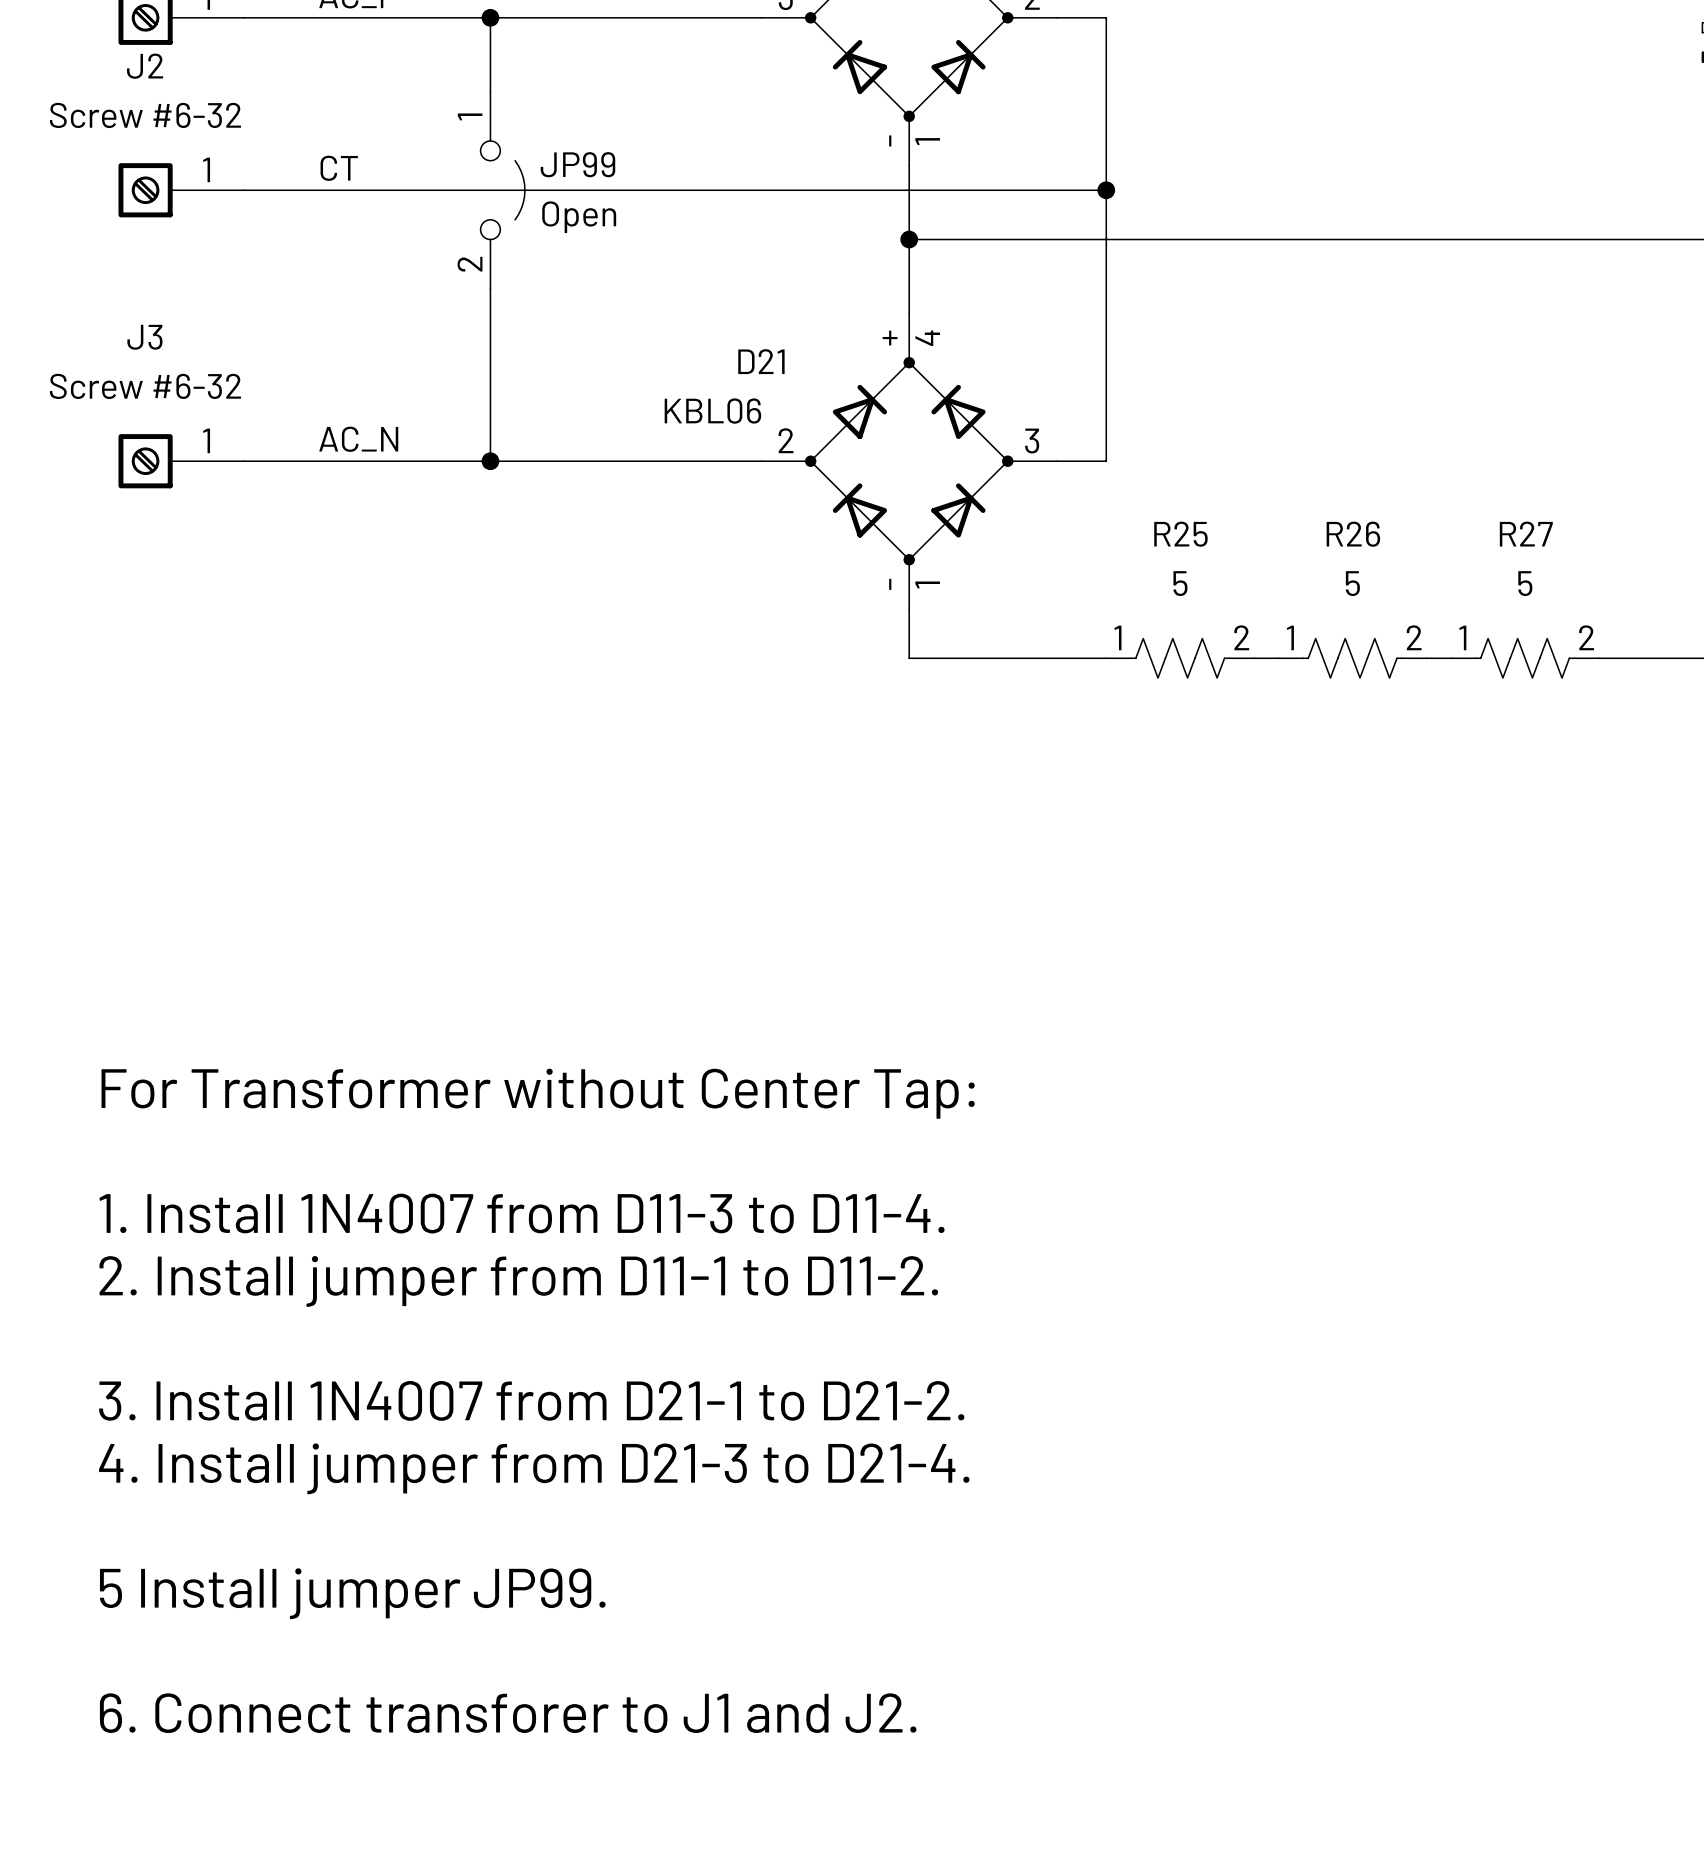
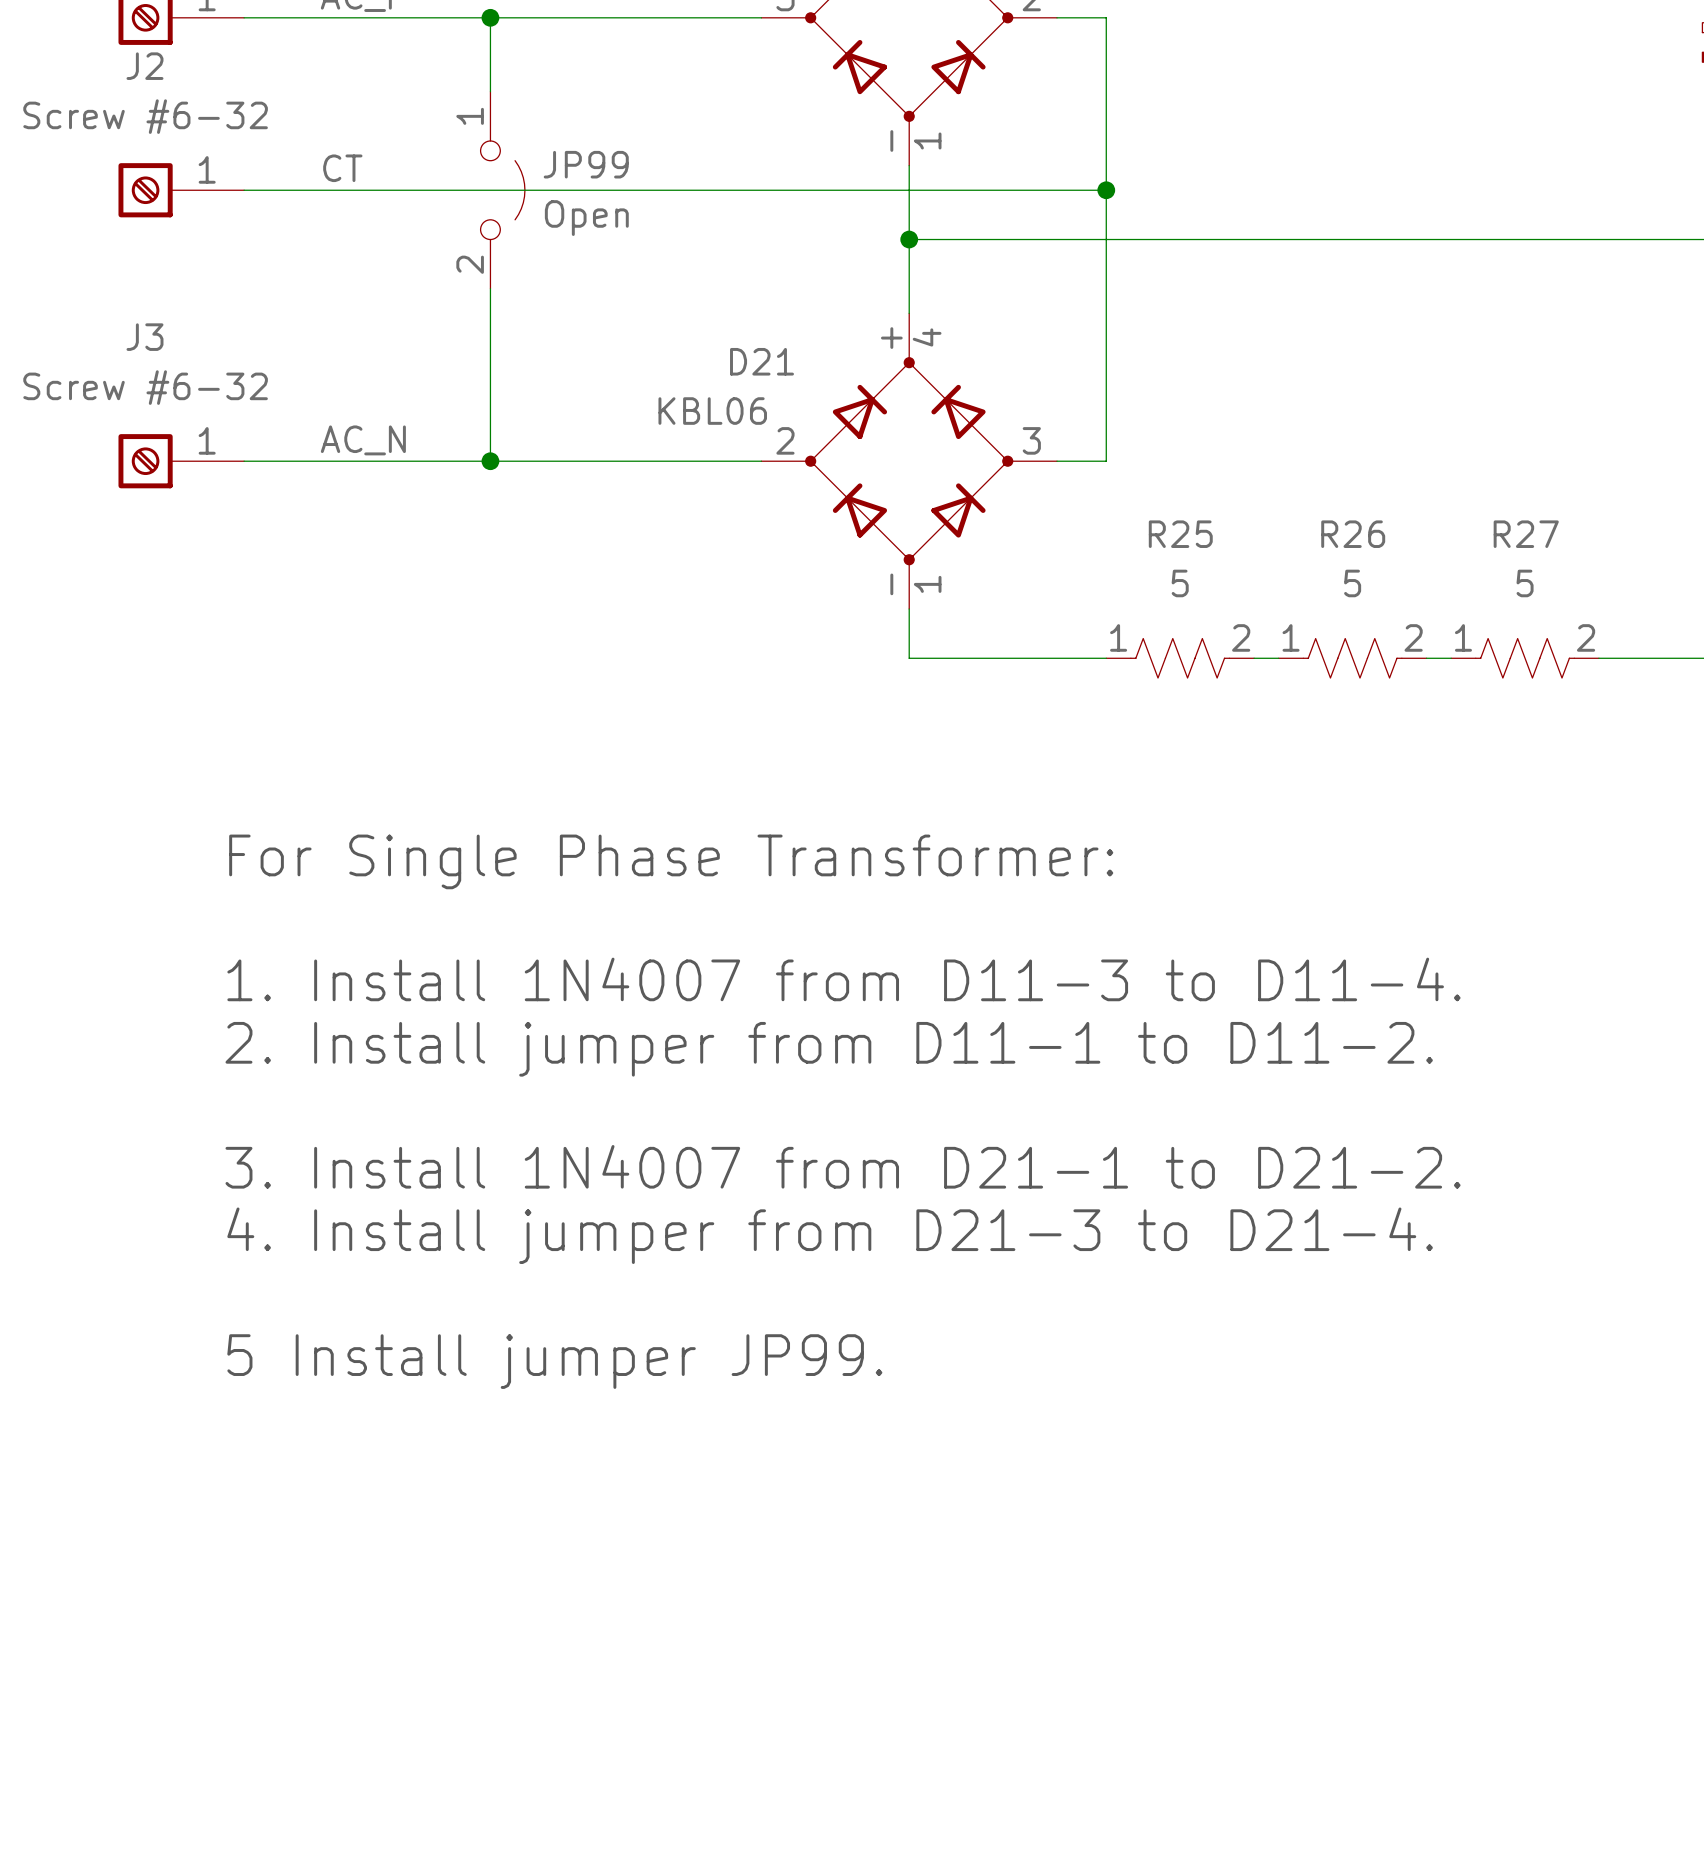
text: none -> For Single Phase Transformer: (671, 861)
text: For Transformer without Center Tap: (538, 1093) -> none
text position: 1. Install 1N4007 from D11-3 to D11-4. (522, 1213) -> 1. Install 1N4007 from D11-3 to D11-4. (843, 979)
text position: 2. Install jumper from D11-1 to D11-2. (518, 1281) -> 2. Install jumper from D11-1 to D11-2. (829, 1049)
text position: 3. Install 1N4007 from D21-1 to D21-2. (531, 1400) -> 3. Install 1N4007 from D21-1 to D21-2. (843, 1166)
text position: 4. Install jumper from D21-3 to D21-4. (534, 1468) -> 4. Install jumper from D21-3 to D21-4. (830, 1235)
text position: 5 Install jumper JP99. (352, 1593) -> 5 Install jumper JP99. (554, 1361)
text: 6. Connect transforer to J1 and J2. (508, 1713) -> none

